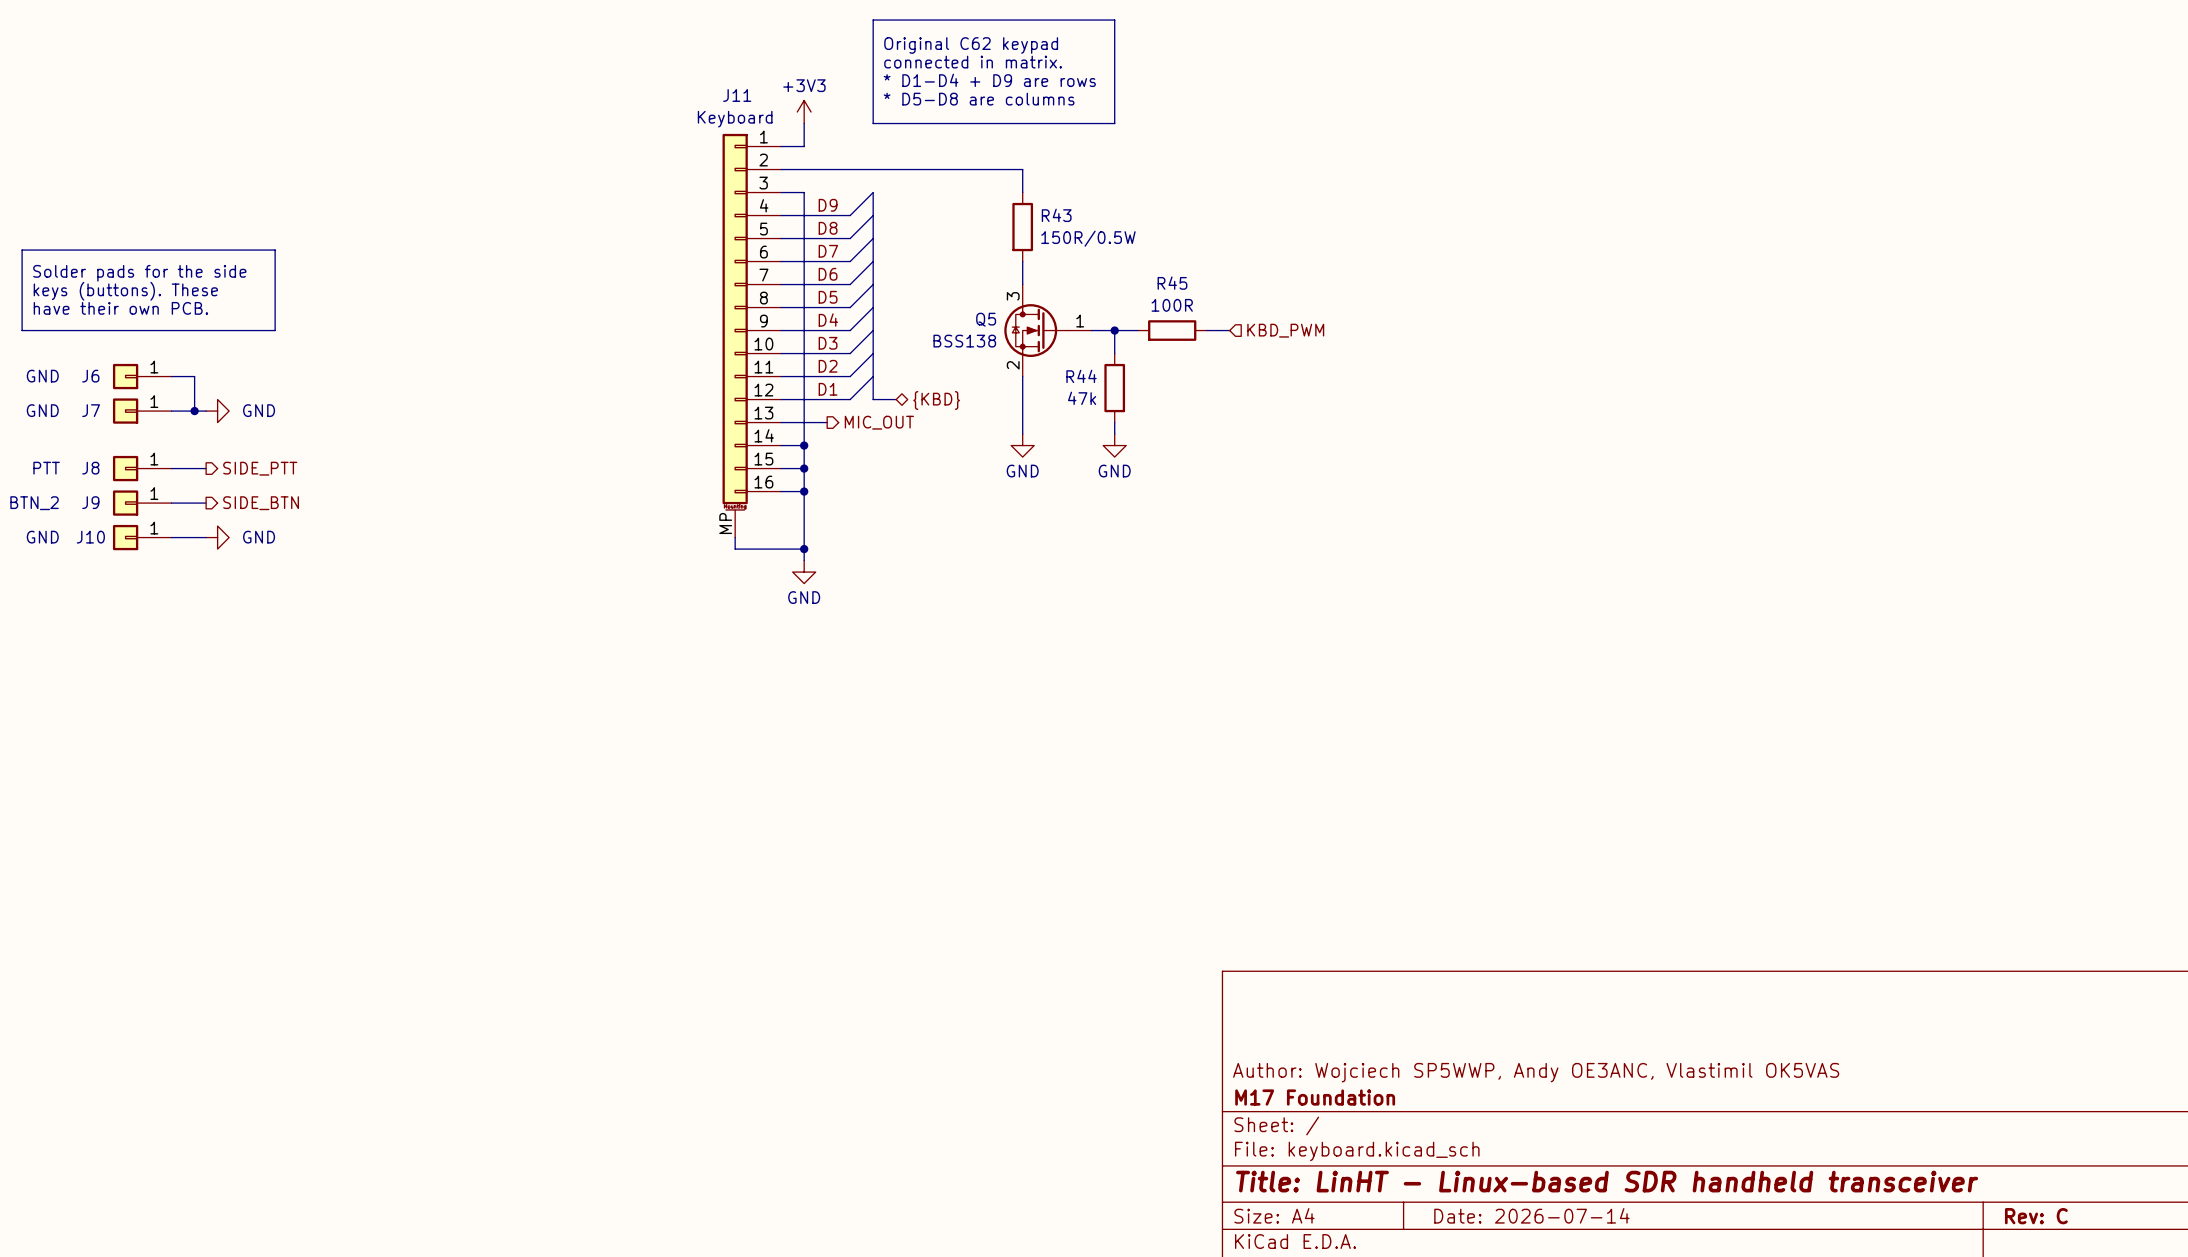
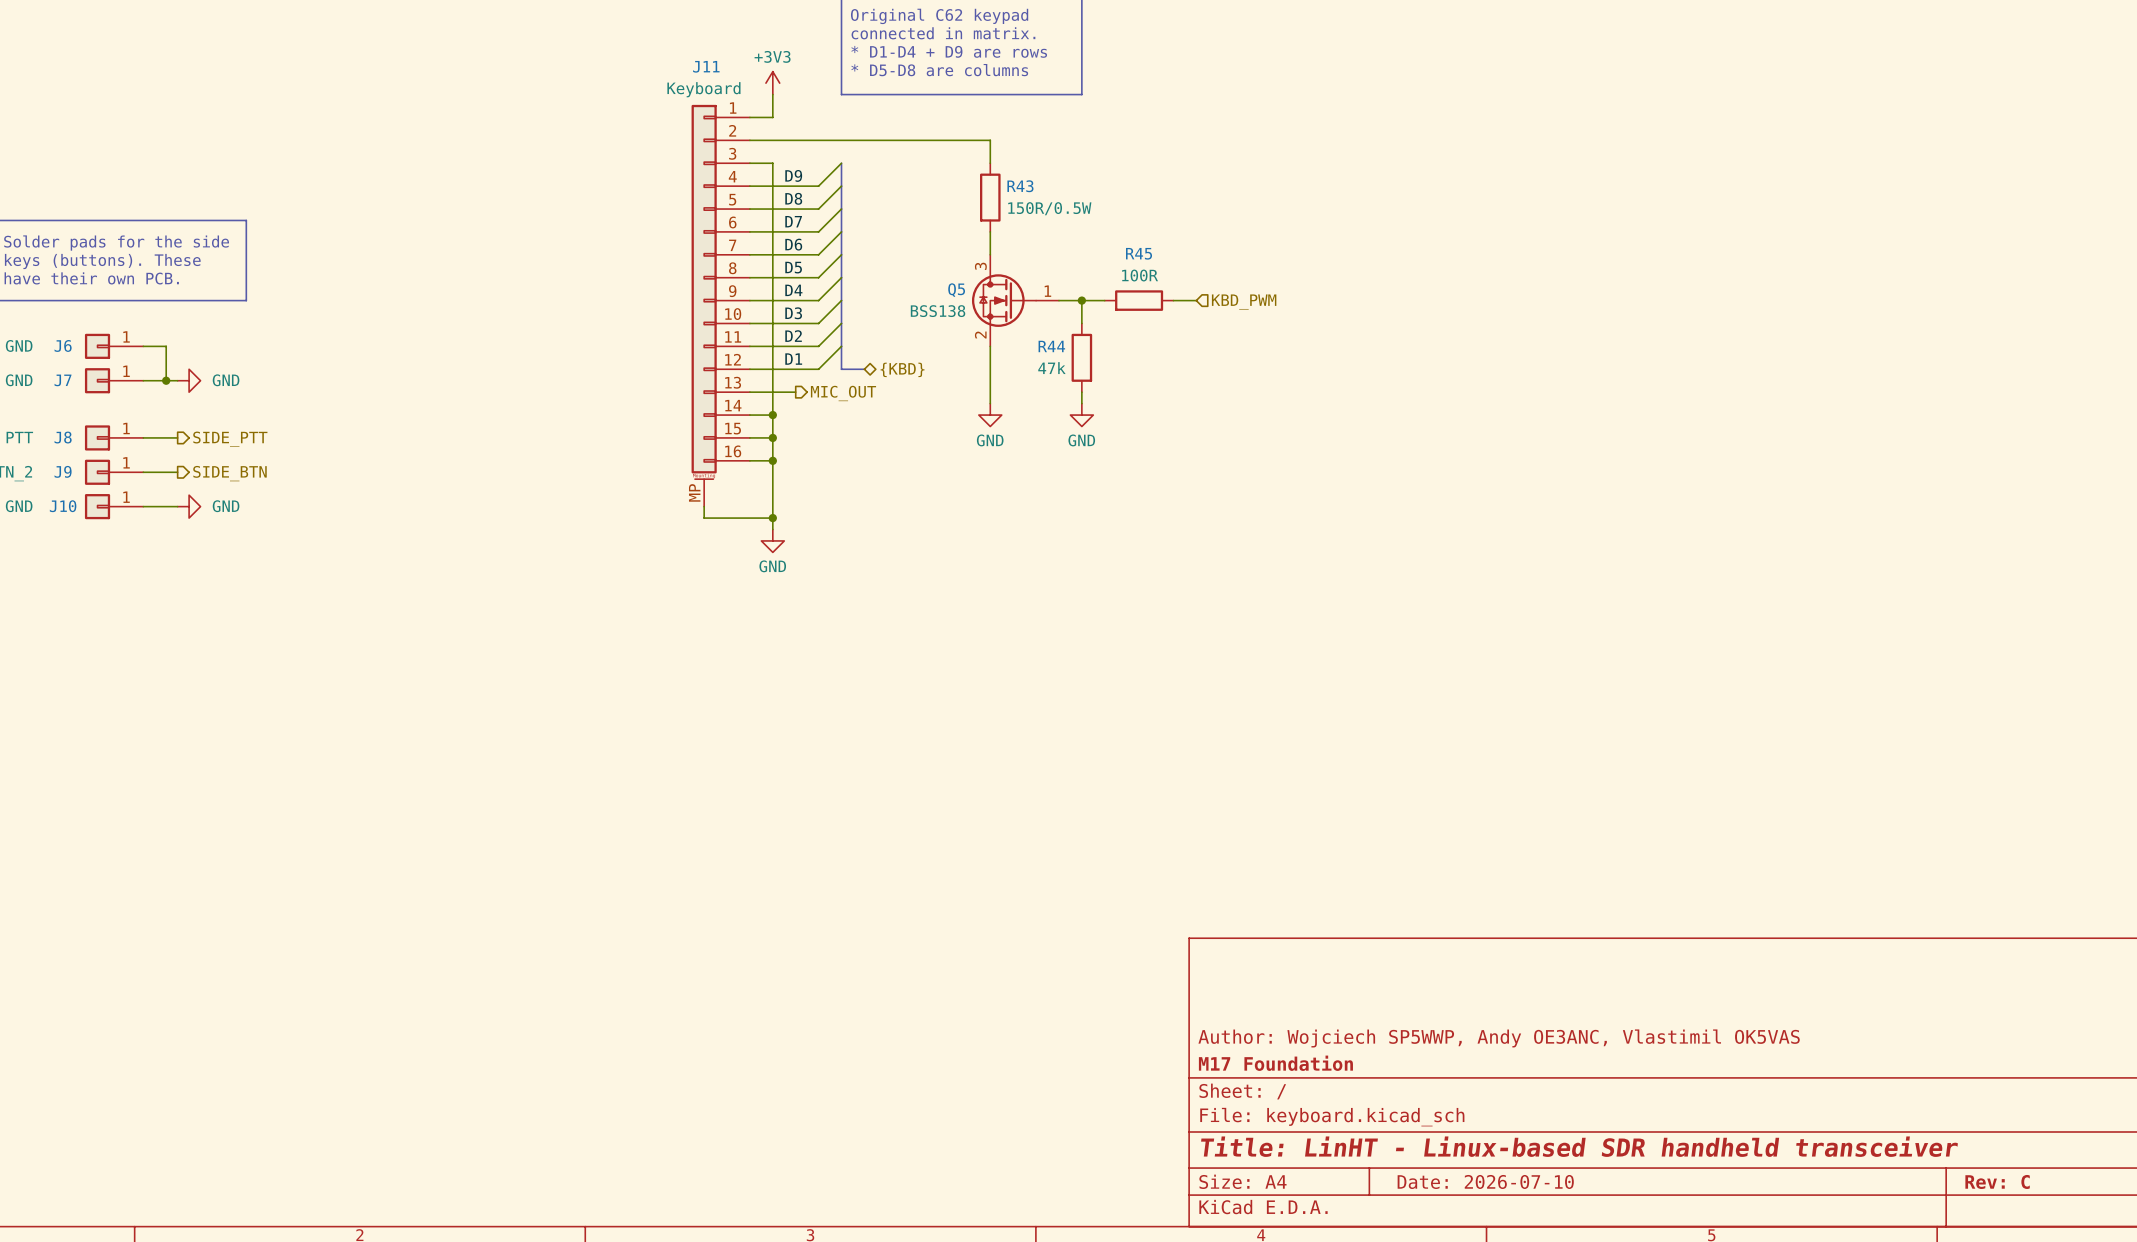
title block: Date: 2026-07-14 (1531, 1215) -> Date: 2026-07-10 (1485, 1181)

